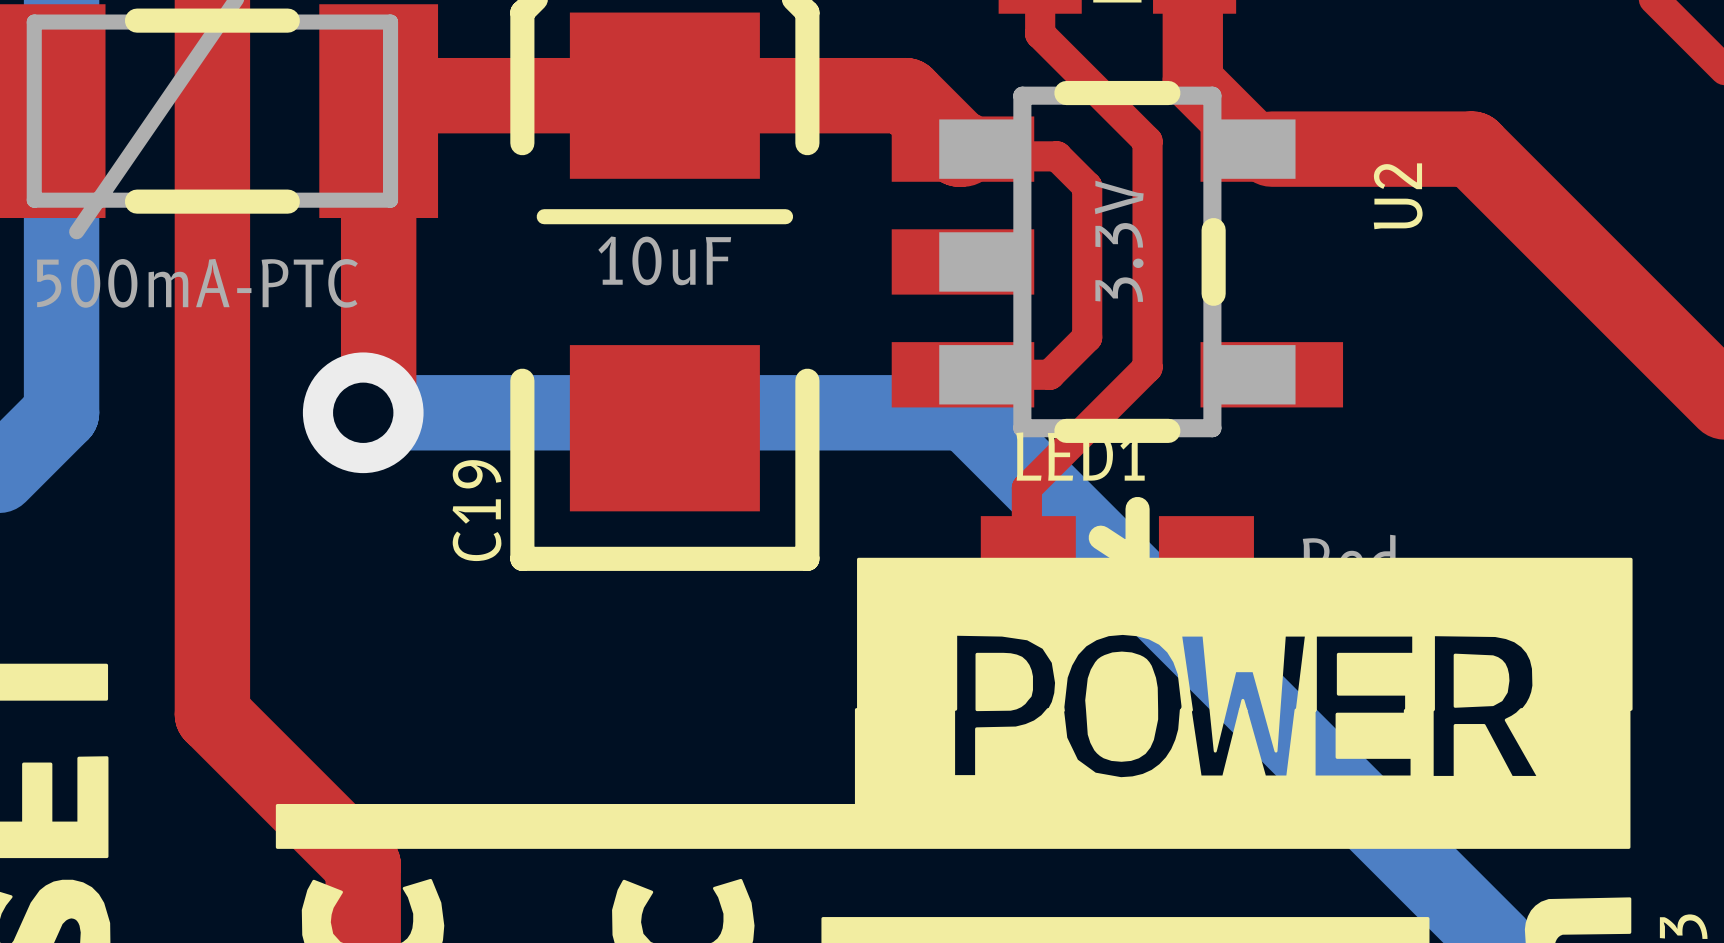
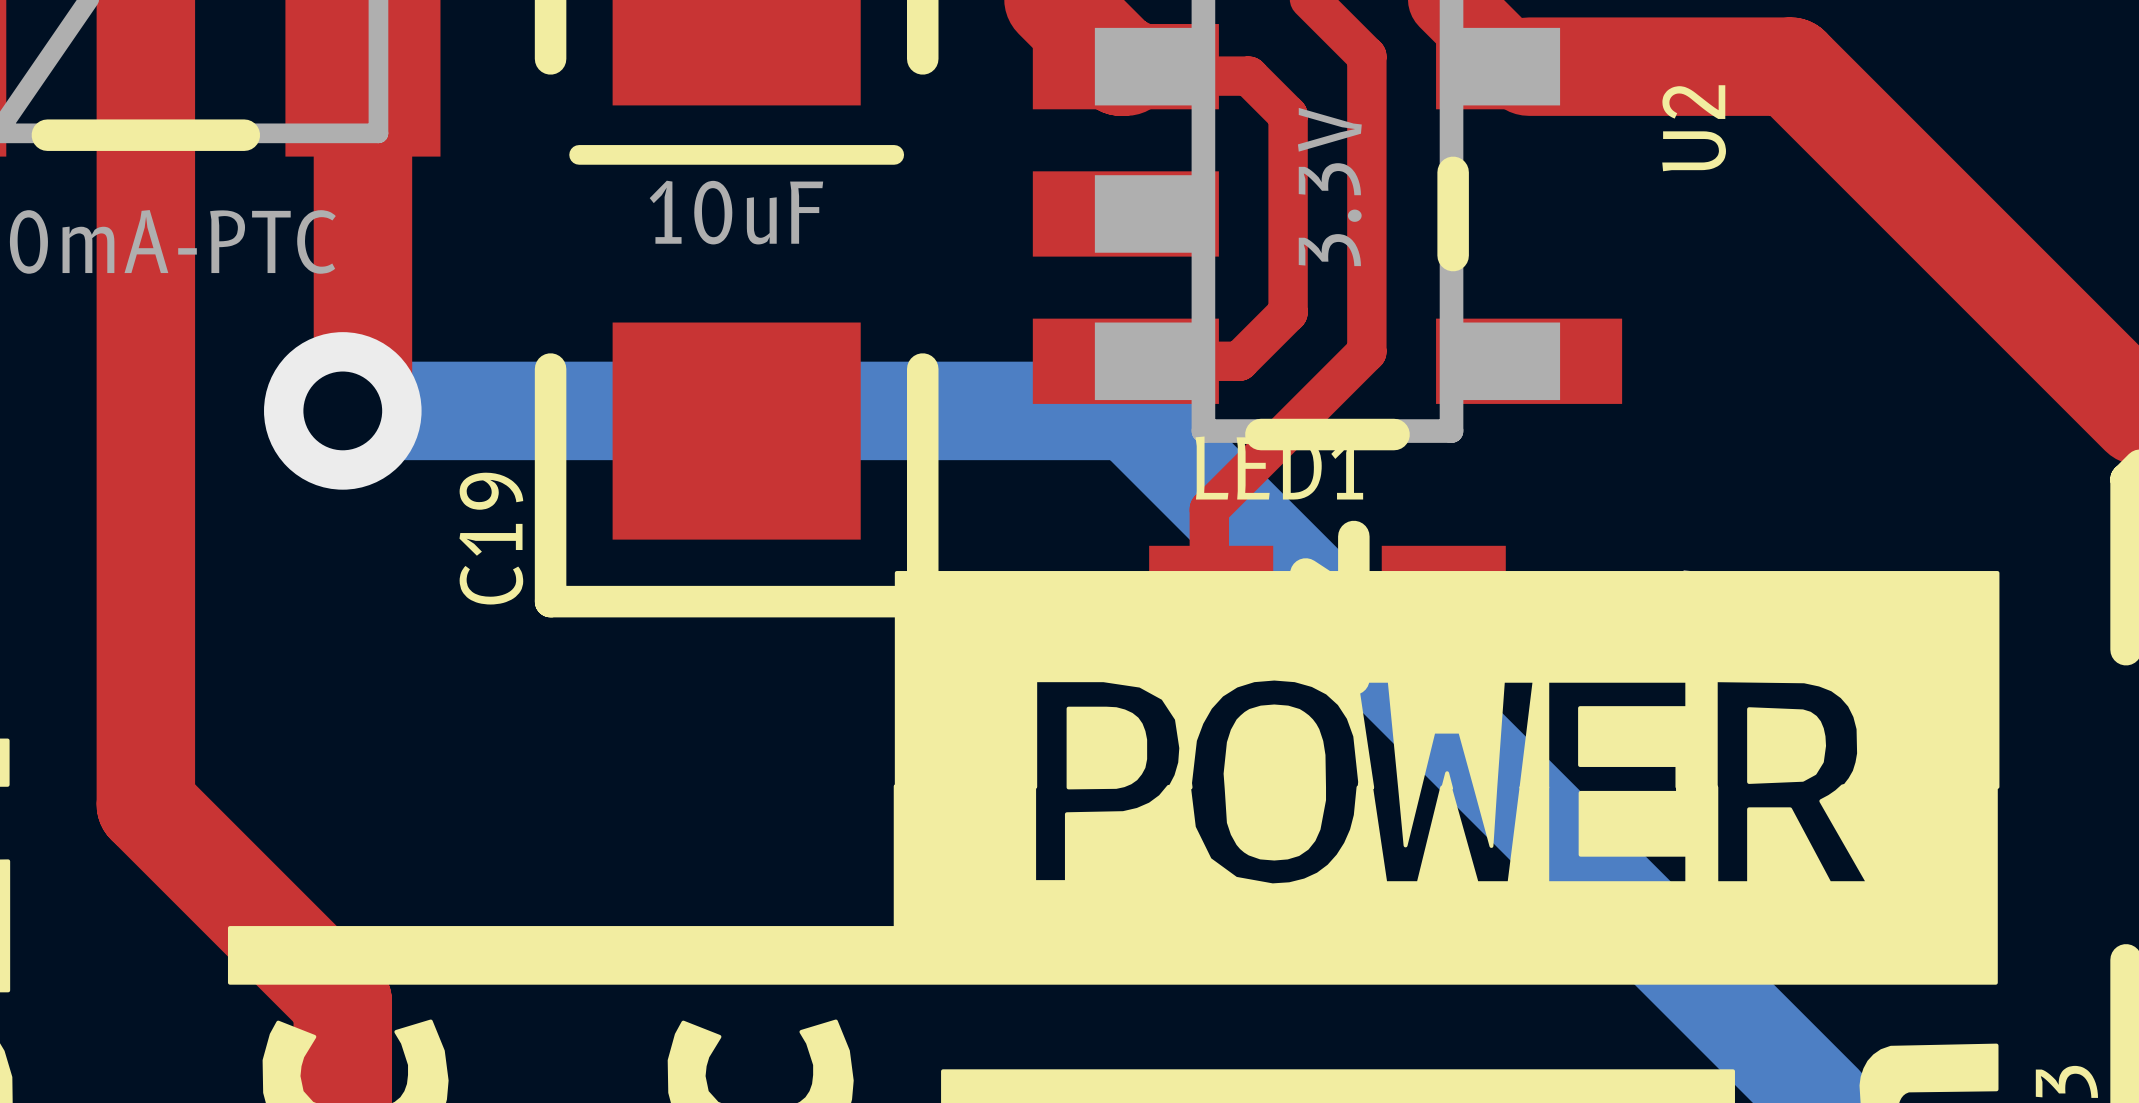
drawing shape: [857, 557, 1633, 753] -> [894, 571, 2000, 848]
drawing: none -> [1066, 706, 1148, 790]
drawing shape: [1085, 651, 1159, 762] -> [1223, 704, 1327, 861]
drawing: [975, 652, 1033, 712] -> none
drawing shape: [1453, 653, 1510, 708] -> [1747, 707, 1827, 784]
drawing position: (1243, 705) -> (1447, 780)
drawing shape: [275, 708, 1631, 849] -> [227, 784, 1998, 985]

